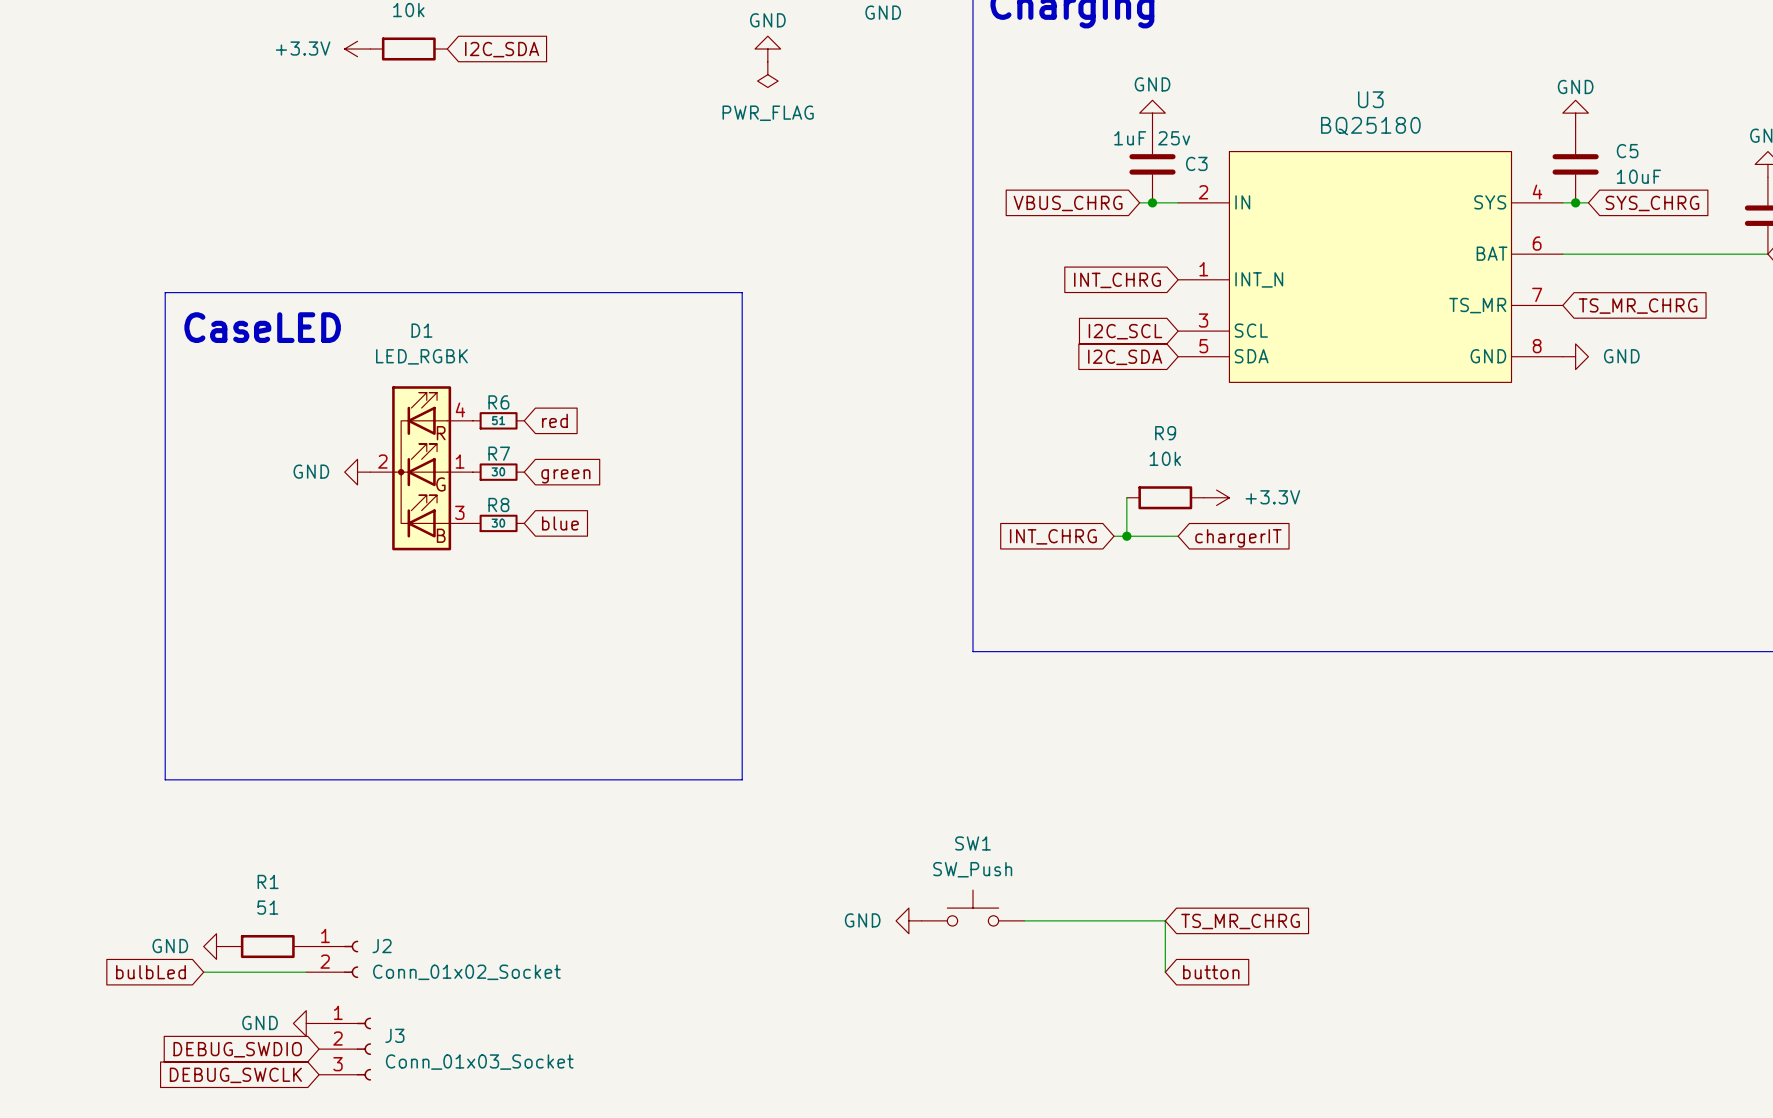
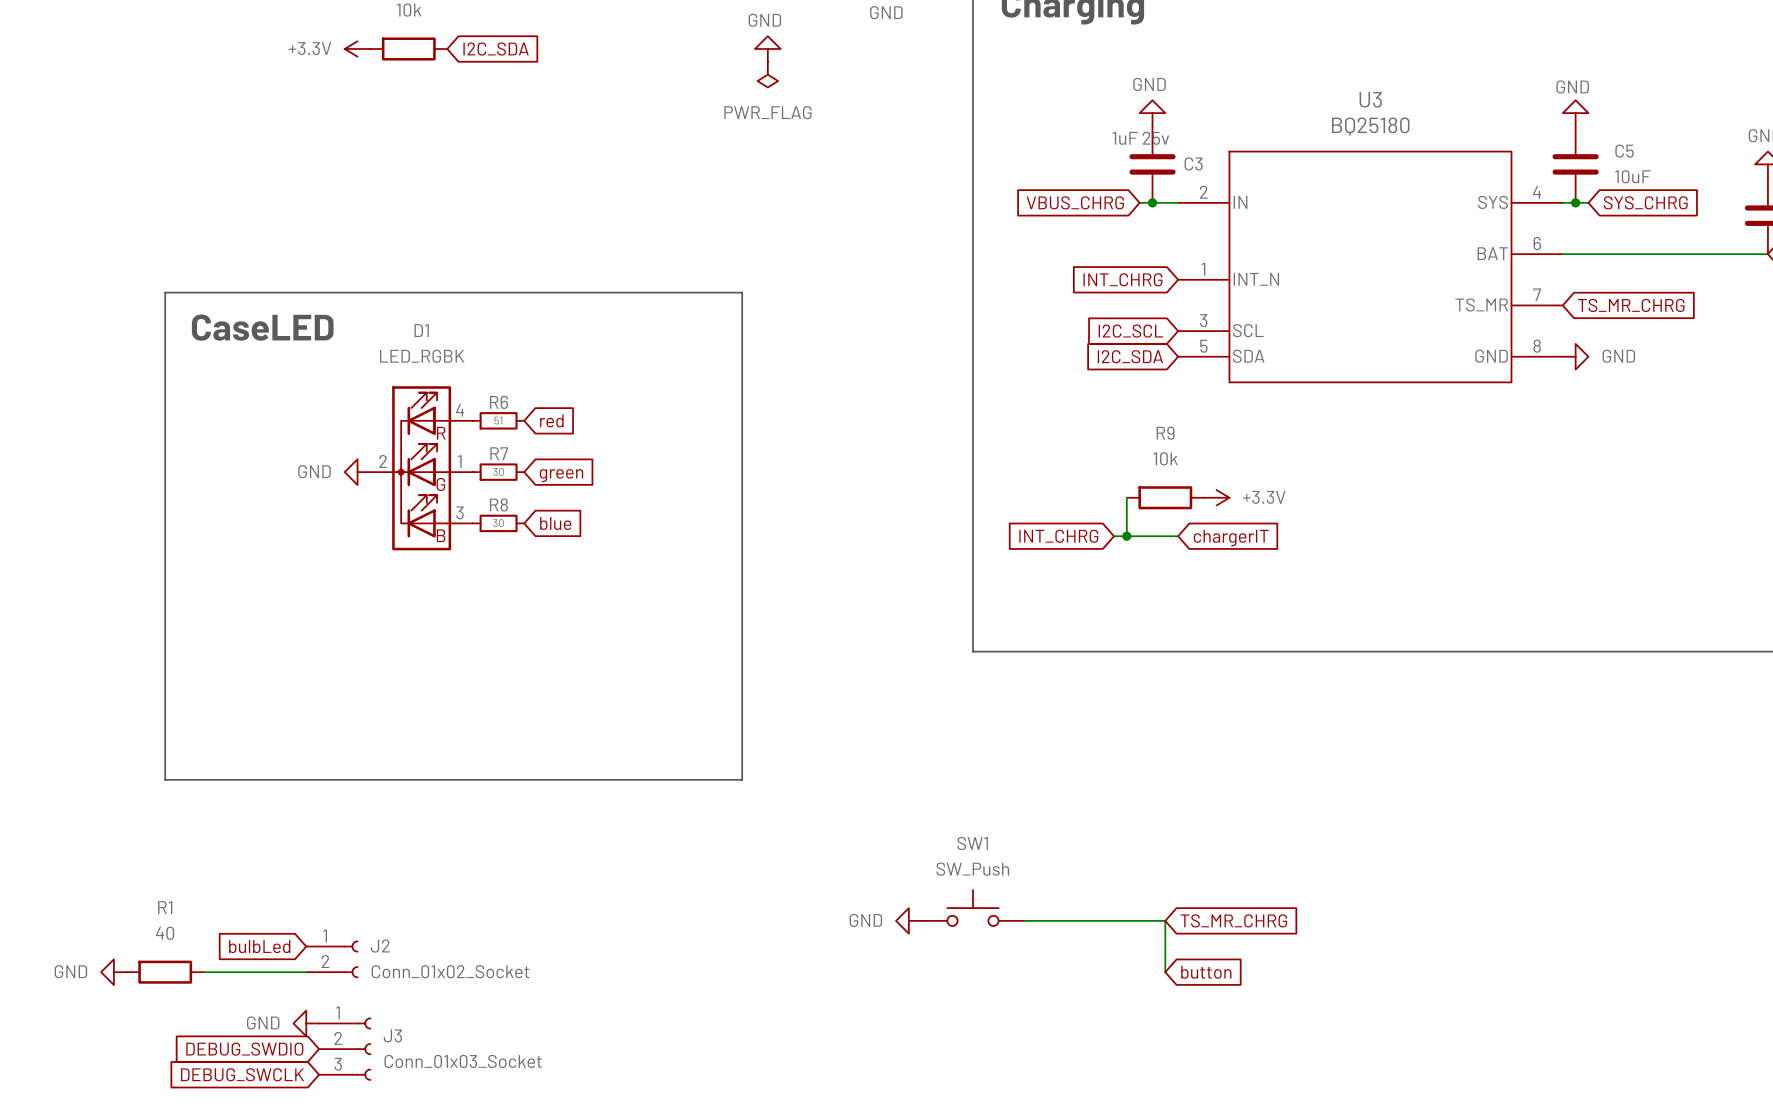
R1 value: 51 (267, 907) -> 40 (165, 933)
power symbol position: GND (216, 946) -> GND (113, 972)
R1 position: (267, 946) -> (165, 972)
global label position: bulbLed (150, 972) -> bulbLed (259, 946)

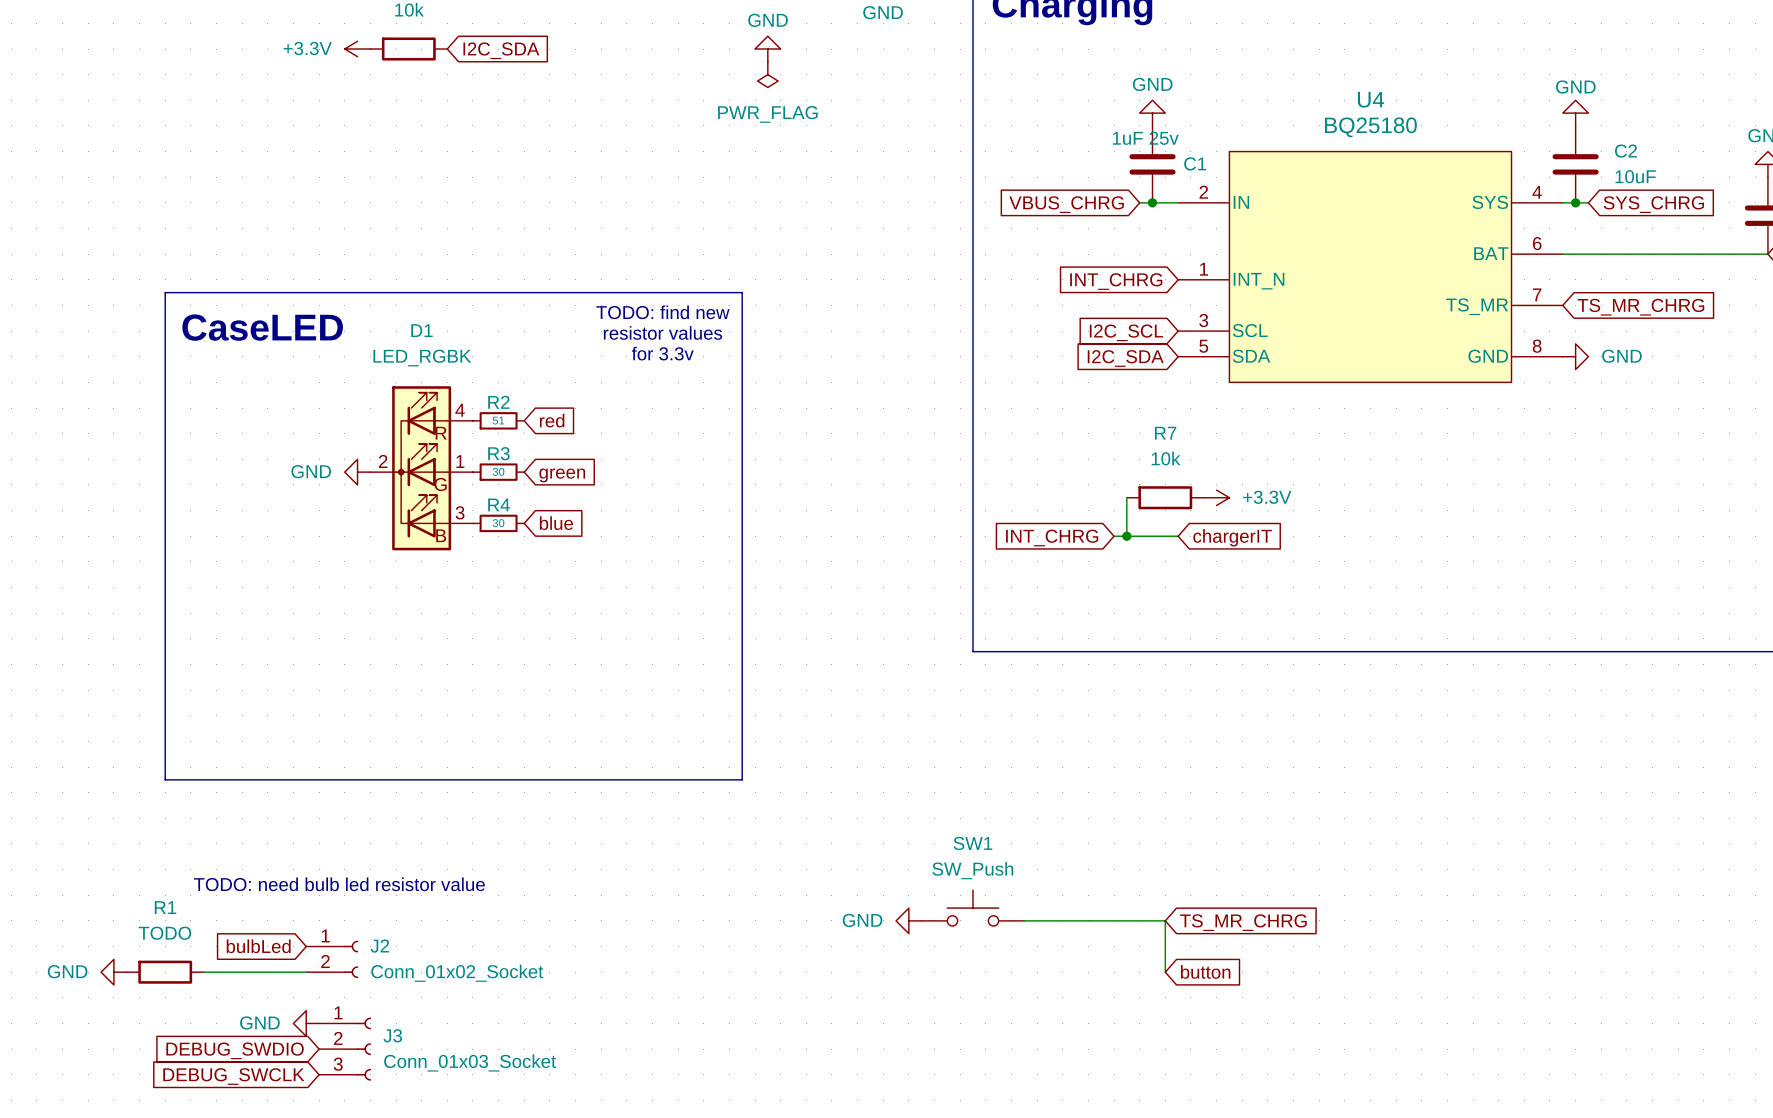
U3 name: U3 (1370, 99) -> U4 (1371, 99)
C5 name: C5 (1624, 151) -> C2 (1626, 151)
C3 name: C3 (1193, 163) -> C1 (1195, 163)
text: none -> TODO: find new (662, 312)
text: none -> resistor values (662, 332)
text: none -> for 3.3v (662, 353)
R6 name: R6 (498, 402) -> R2 (498, 402)
R9 name: R9 (1165, 433) -> R7 (1165, 433)
R7 name: R7 (499, 453) -> R3 (498, 453)
R8 name: R8 (498, 504) -> R4 (499, 504)
text: none -> TODO: need bulb led resistor value (339, 884)
R1 value: 40 (165, 933) -> TODO (164, 933)

